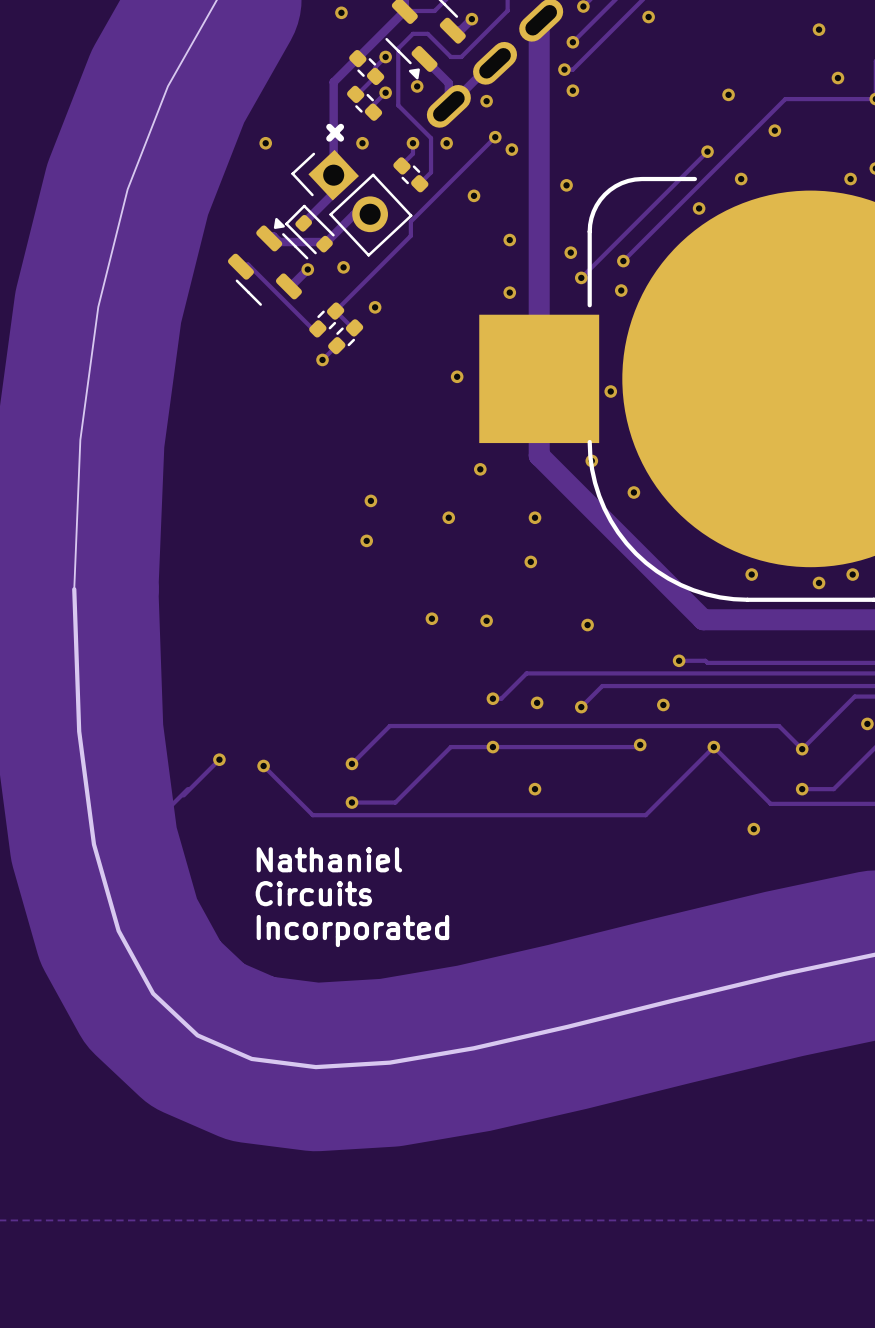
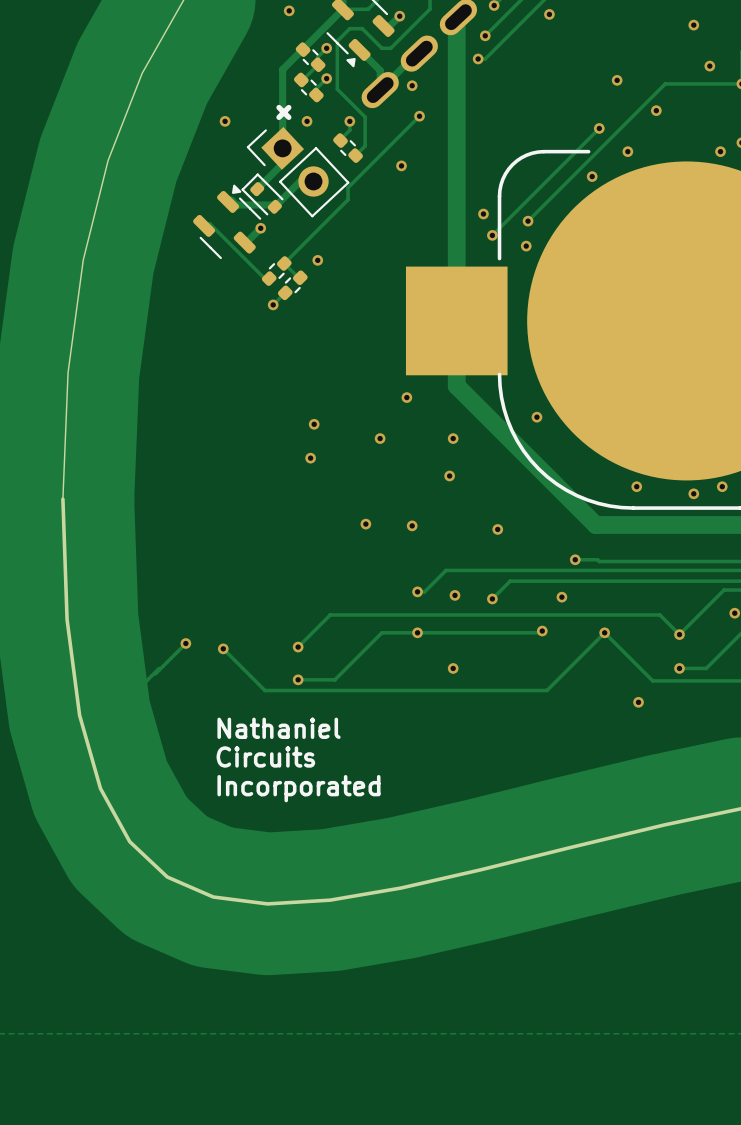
via: (417, 86) -> none
via: (572, 90) -> none
via: (446, 143) -> none
via: (511, 149) -> none
via: (566, 185) -> none
via: (509, 240) -> none
via: (343, 267) -> none
via: (509, 292) -> none
via: (457, 376) -> none
via: (610, 391) -> none
via: (591, 460) -> none

